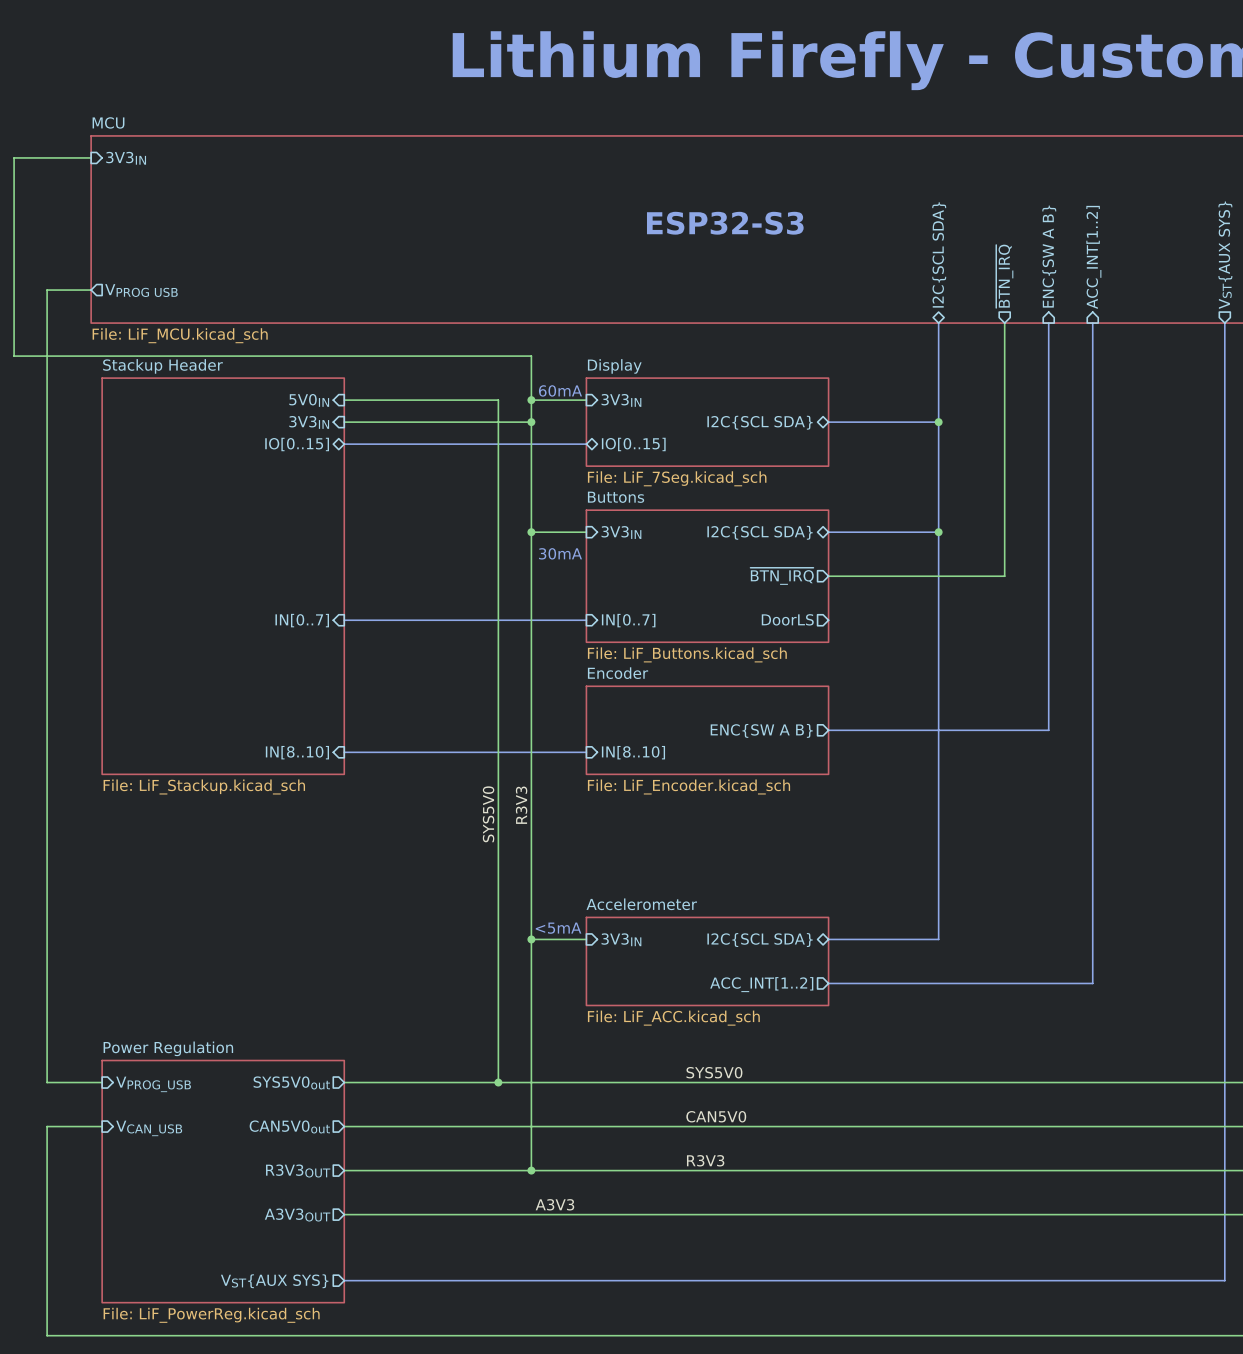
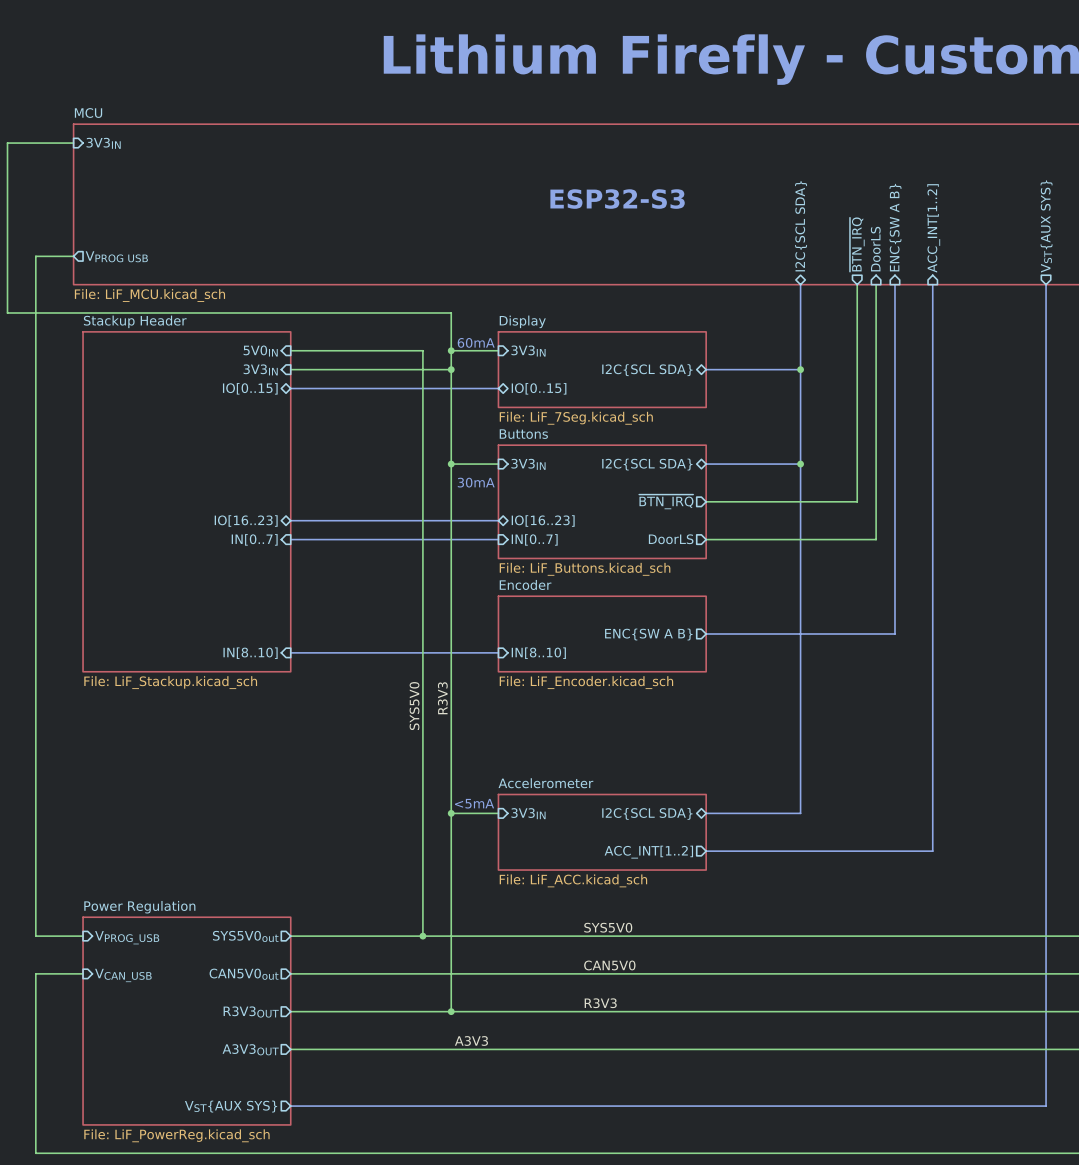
sheet pin: none -> DoorLS (875, 249)
wire: none -> (876, 284) (876, 539) (706, 539)
sheet pin: none -> IO[16..23] (246, 521)
bus: none -> (290, 520) (498, 520)
sheet pin: none -> IO[16..23] (543, 521)

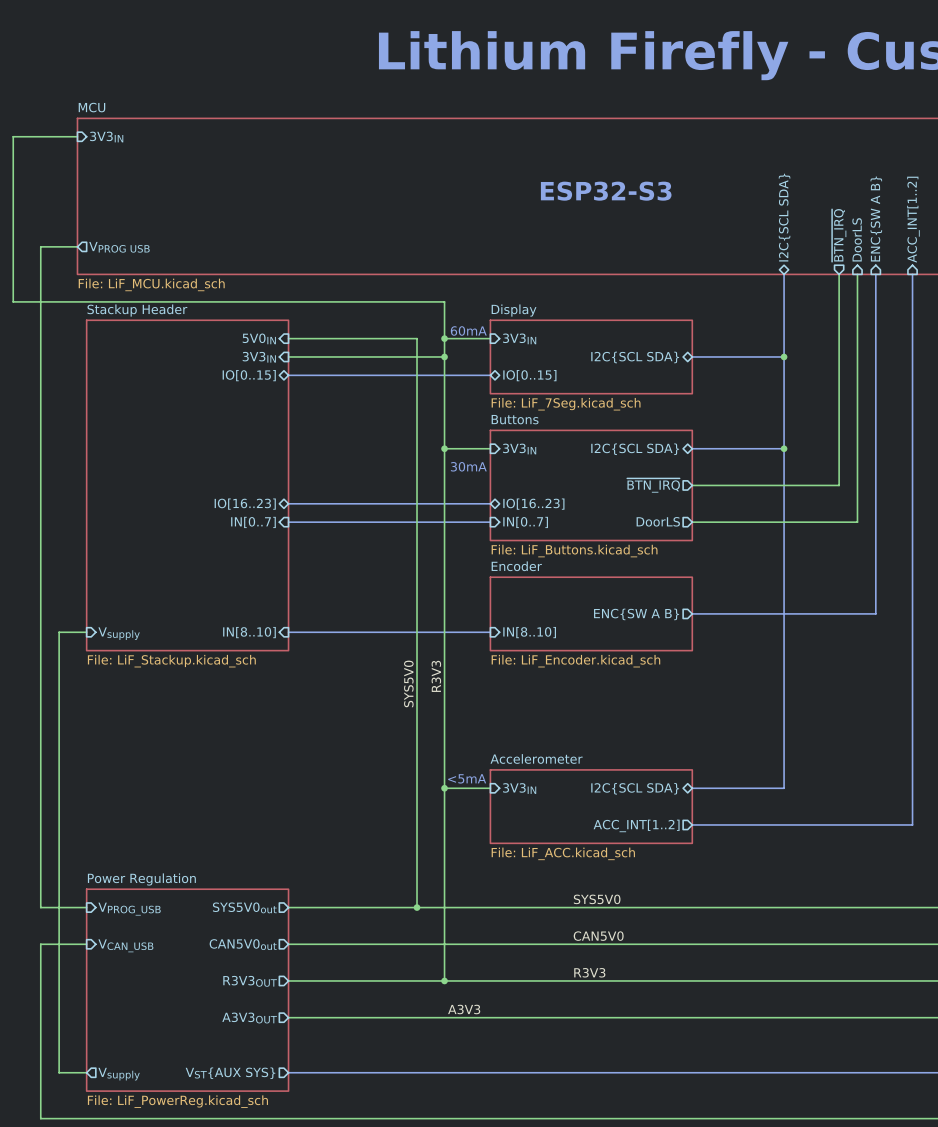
wire: none -> (86, 632) (59, 632) (59, 1072) (86, 1072)
sheet pin: none -> Vsupply (119, 633)
sheet pin: none -> Vsupply (119, 1074)

